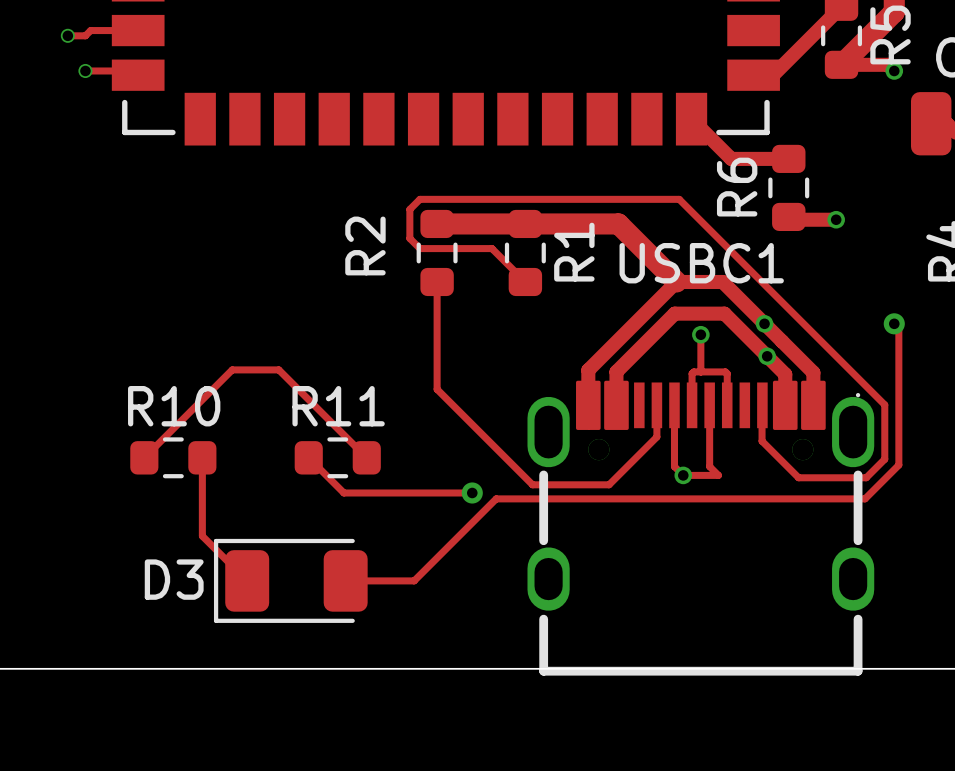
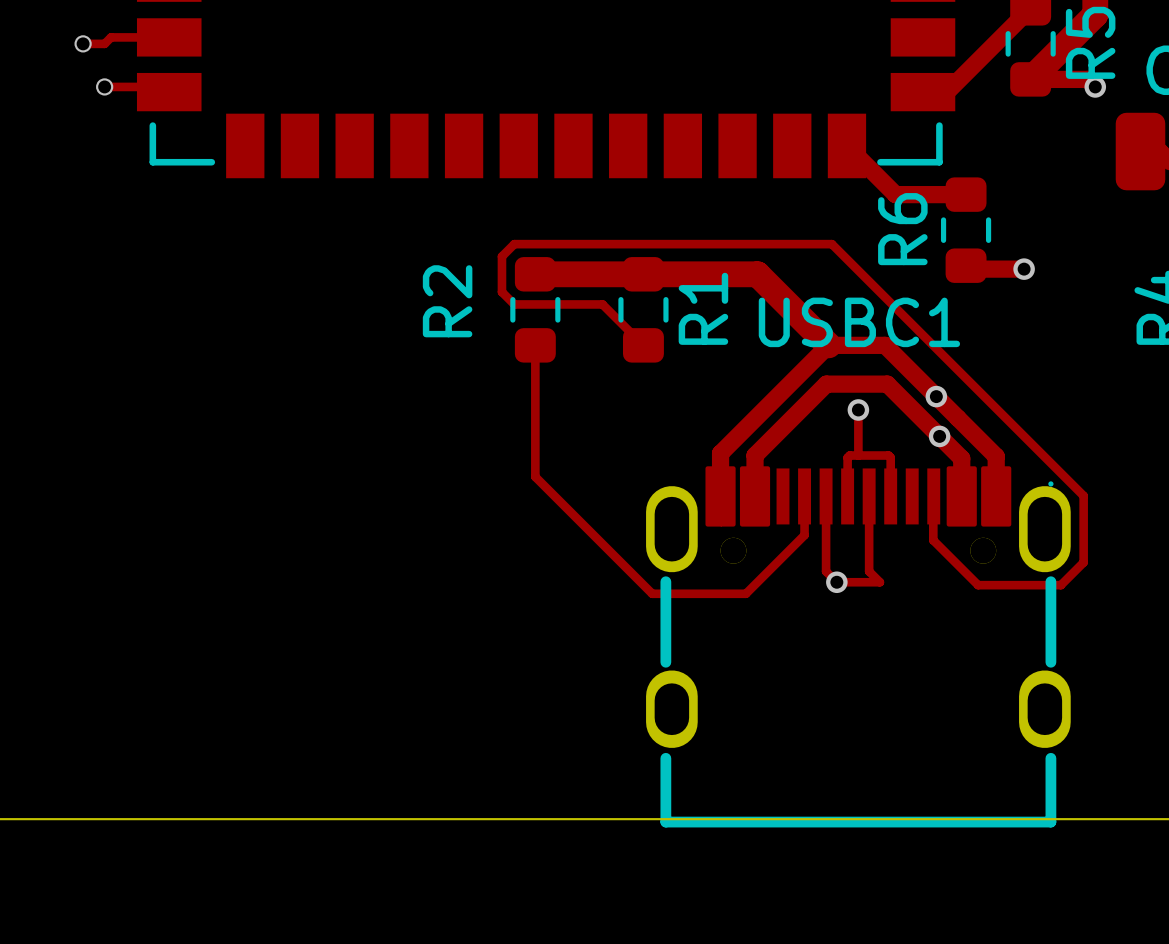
track: (894, 323) (898, 328) (898, 465) (865, 498) (496, 498) (414, 580) (345, 580) -> none
via: (894, 323) -> none
track: (144, 457) (232, 369) (278, 369) (366, 457) -> none
R10: (173, 457) -> none
track: (202, 457) (202, 536) (247, 580) -> none
track: (308, 457) (343, 492) (472, 492) -> none
R11: (337, 457) -> none
via: (472, 492) -> none
D3: (290, 580) -> none

